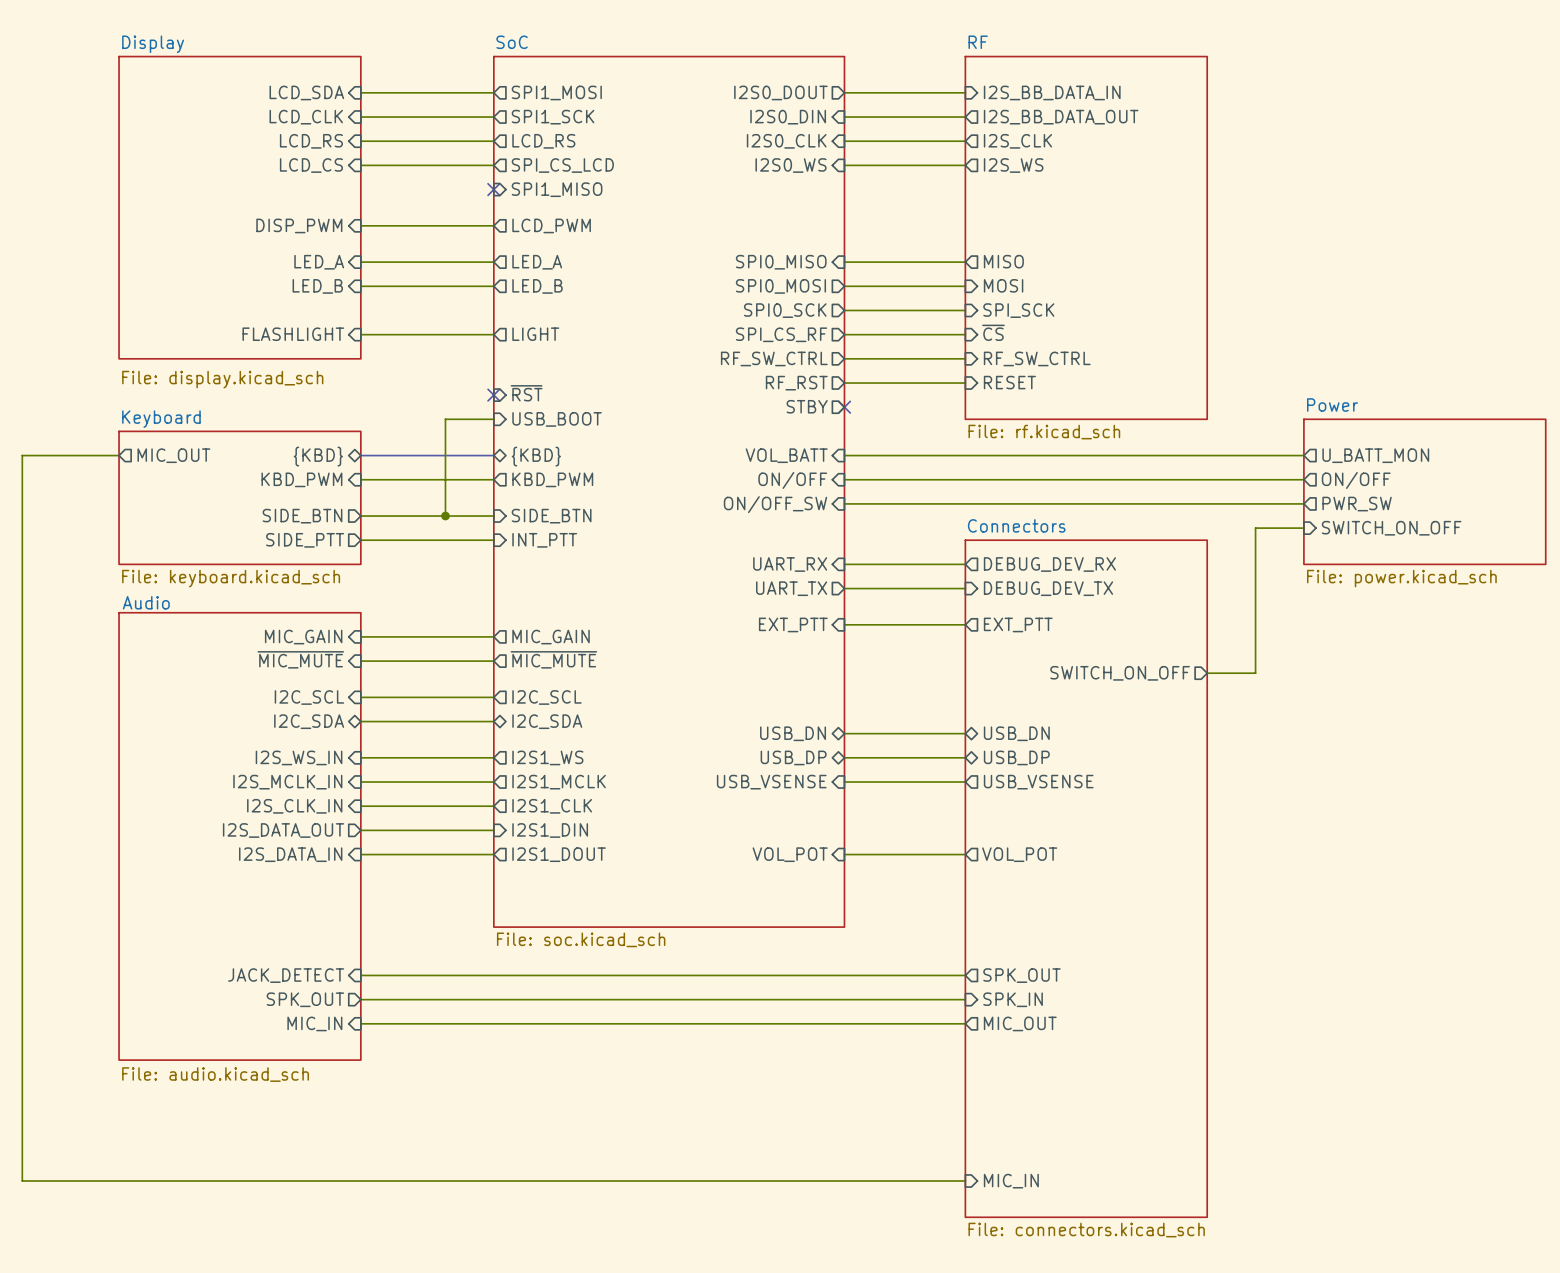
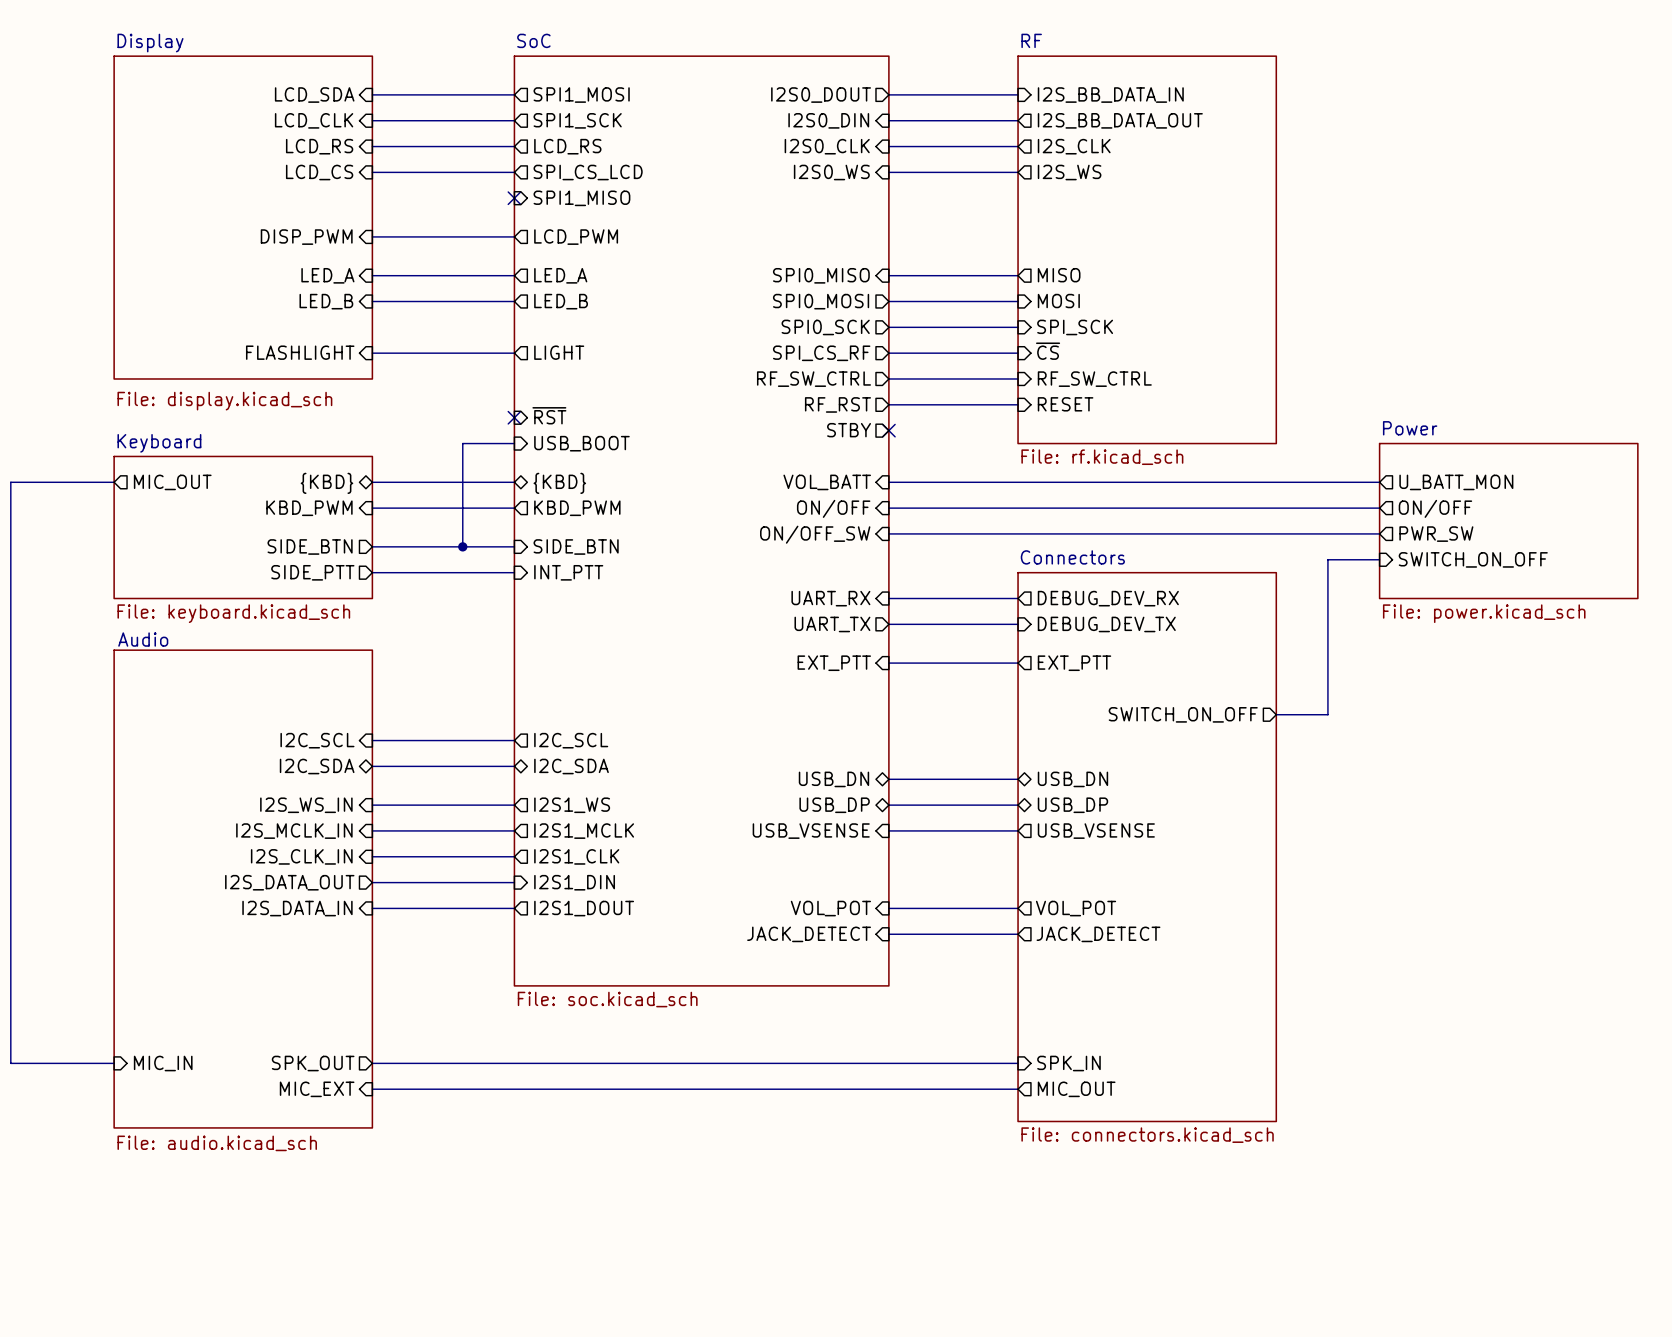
wire: (360, 636) (493, 636) -> none
sheet pin: MIC_GAIN (303, 637) -> none
sheet pin: MIC_GAIN (551, 637) -> none
sheet pin: ~{MIC_MUTE} (300, 659) -> none
sheet pin: ~{MIC_MUTE} (553, 659) -> none
wire: (360, 661) (493, 661) -> none
sheet Connectors: none -> File: connectors.kicad_sch (1147, 847)
sheet pin: none -> JACK_DETECT (809, 934)
wire: none -> (888, 934) (1018, 934)
sheet pin: none -> JACK_DETECT (1098, 934)
sheet Connectors: File: connectors.kicad_sch (1086, 878) -> none
sheet pin: JACK_DETECT (286, 975) -> none
wire: (360, 975) (965, 975) -> none
sheet pin: SPK_OUT (1021, 975) -> none
wire: (22, 999) (22, 1181) (965, 1181) -> (10, 1063) (114, 1063)
sheet pin: none -> MIC_IN (163, 1063)
sheet pin: MIC_IN (314, 1023) -> MIC_EXT (317, 1089)
sheet pin: MIC_IN (1011, 1181) -> none

